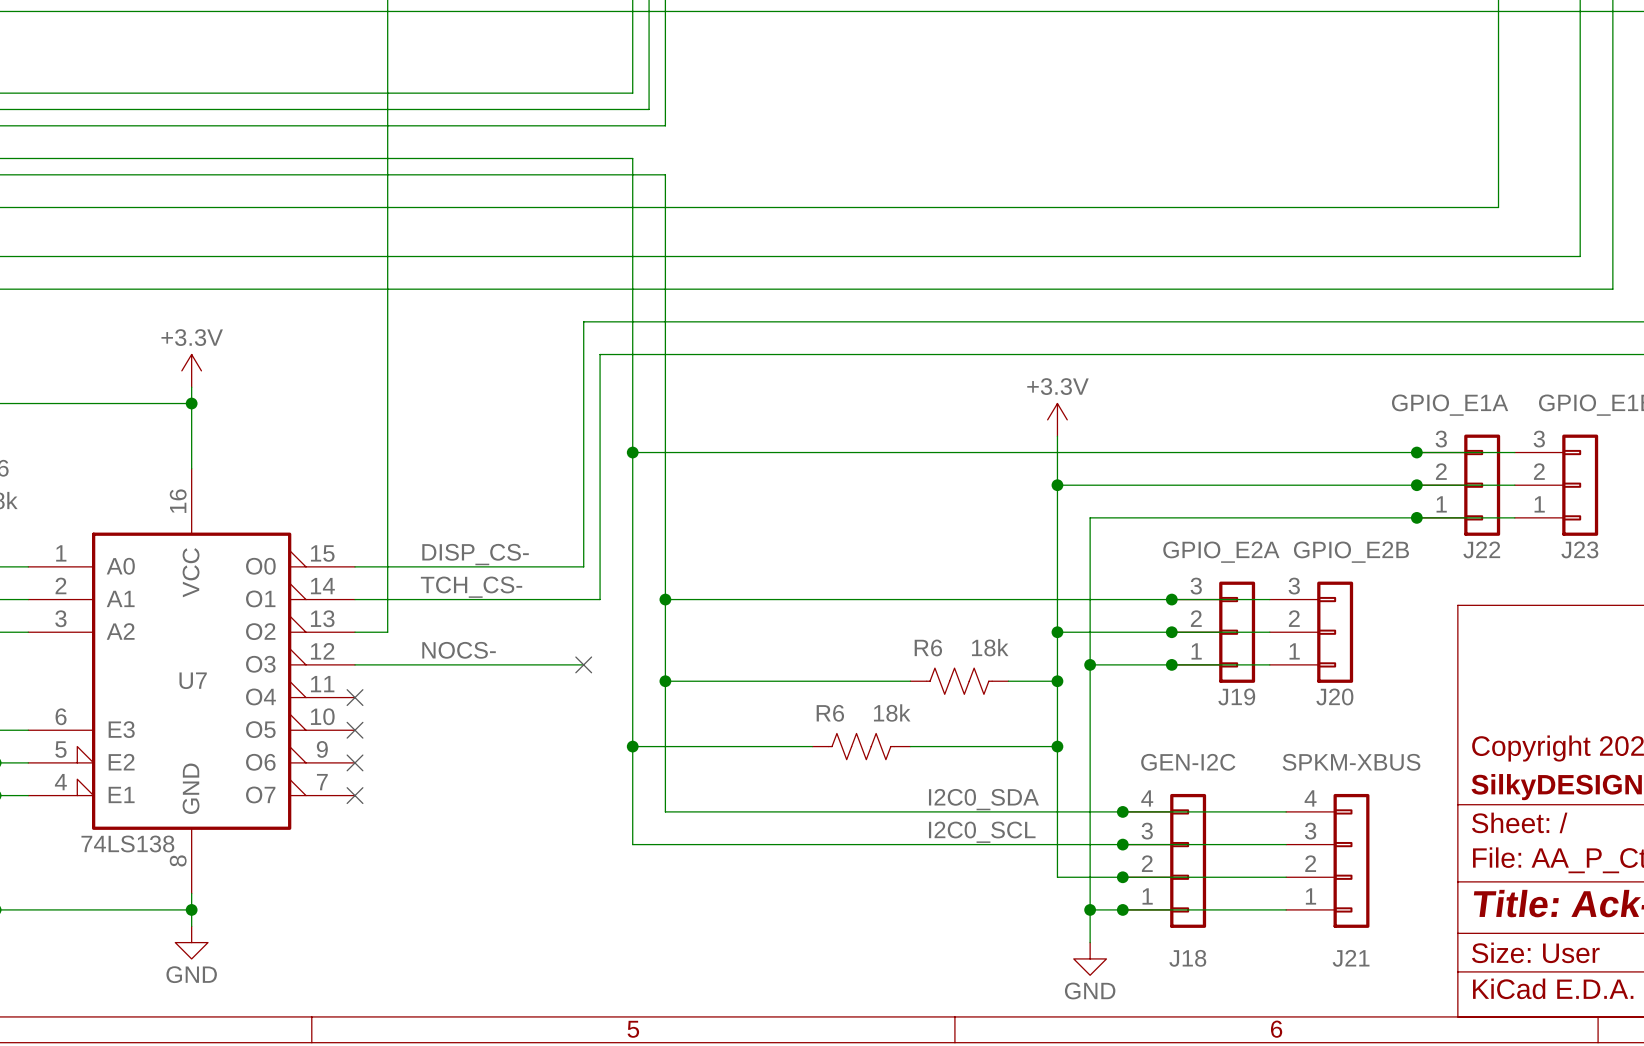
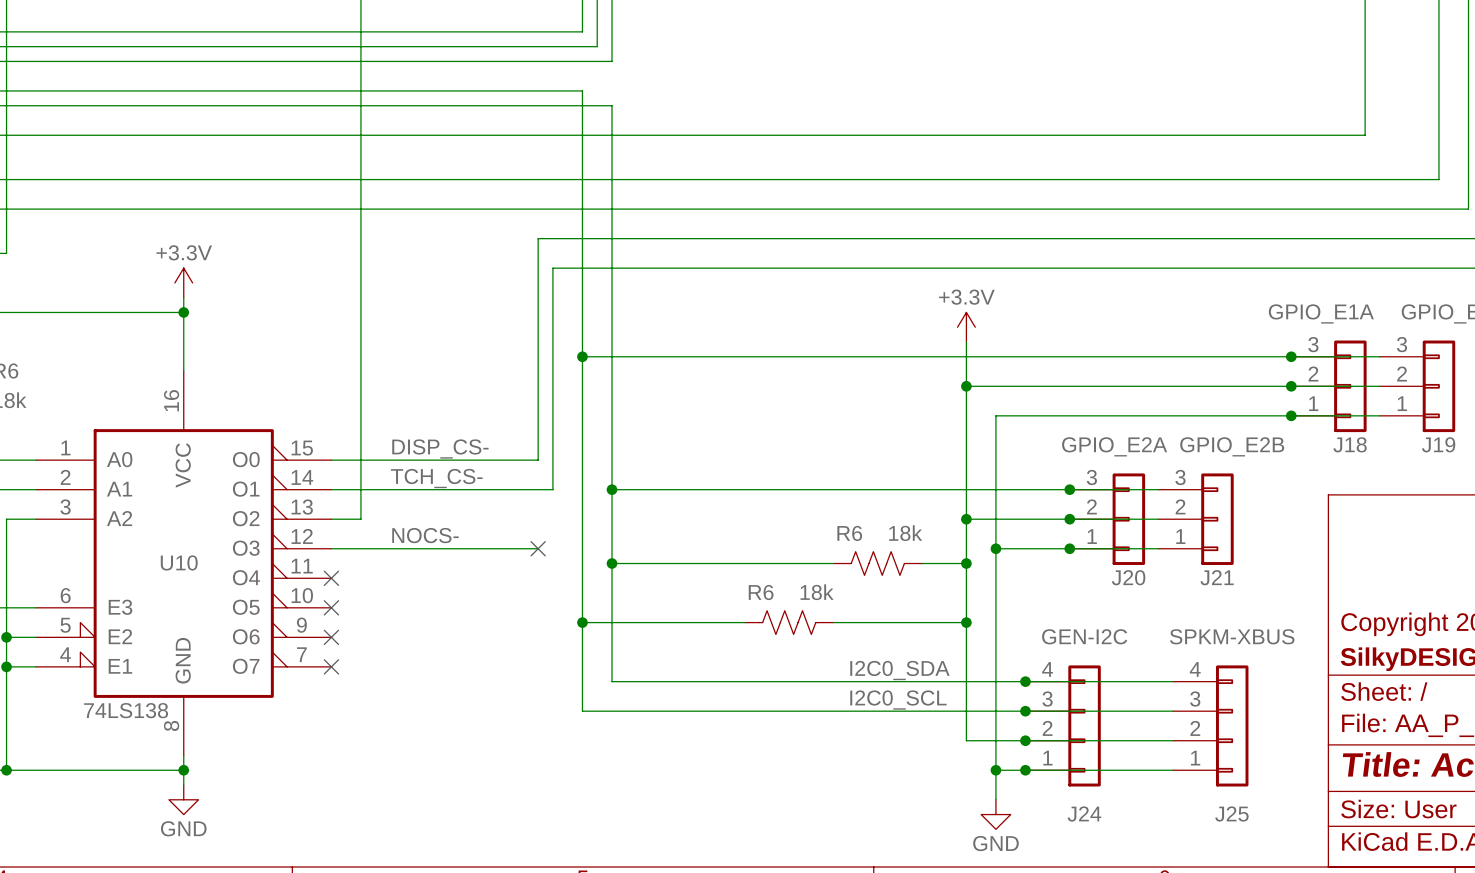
J22 name: J22 (1481, 549) -> J18 (1350, 444)
J23 name: J23 (1579, 549) -> J19 (1438, 444)
U7 name: U7 (193, 680) -> U10 (179, 562)
J19 name: J19 (1236, 696) -> J20 (1128, 577)
J20 name: J20 (1334, 696) -> J21 (1217, 577)
J18 name: J18 (1187, 958) -> J24 (1084, 814)
J21 name: J21 (1351, 958) -> J25 (1231, 814)

